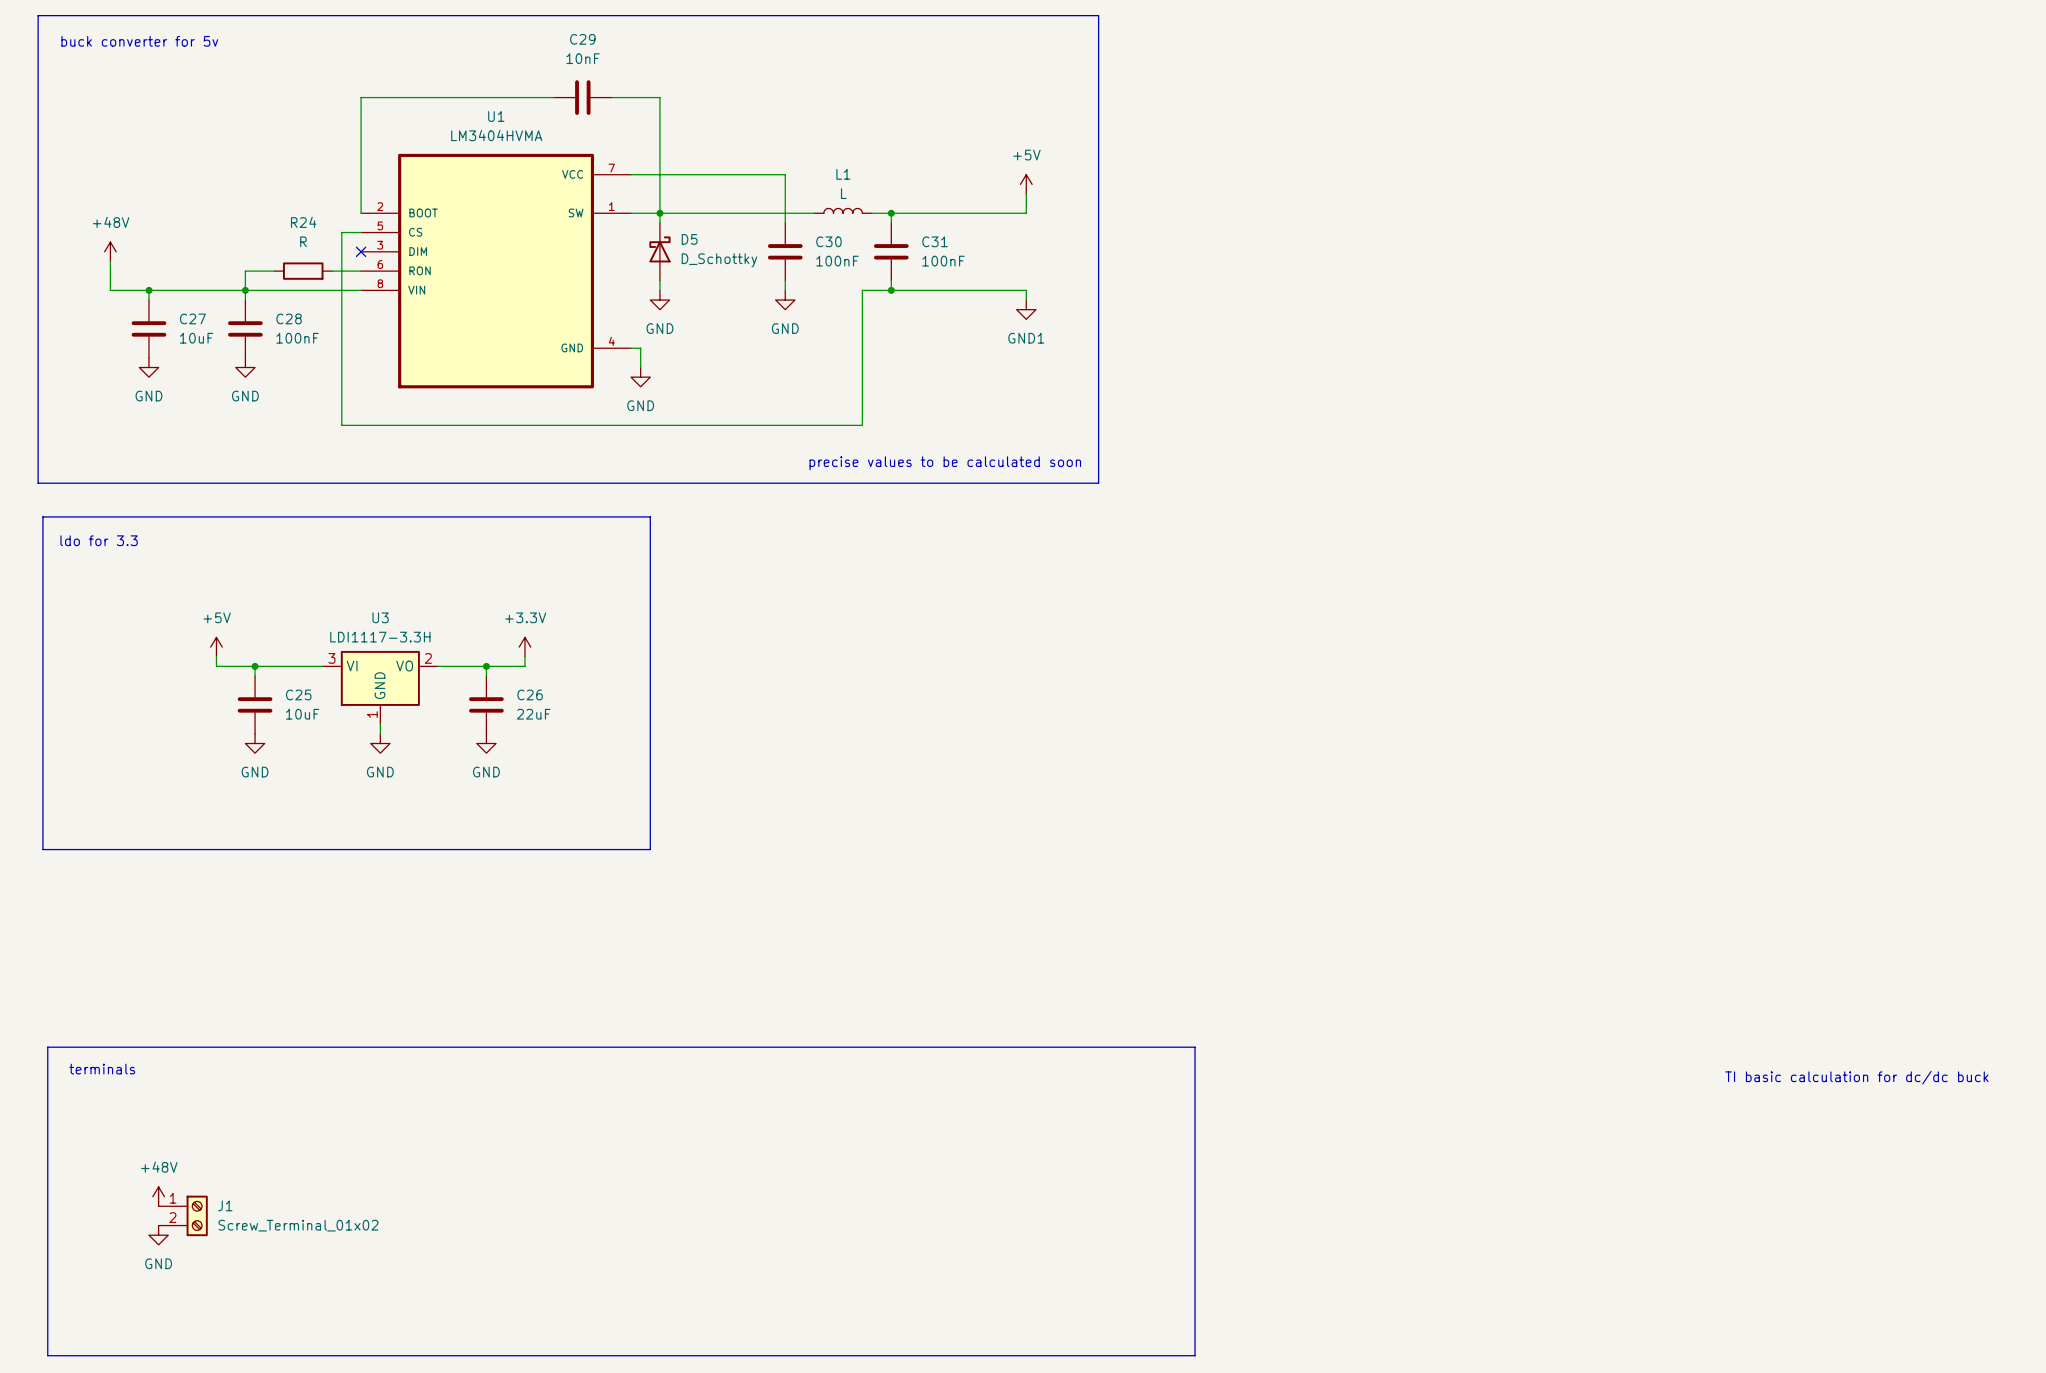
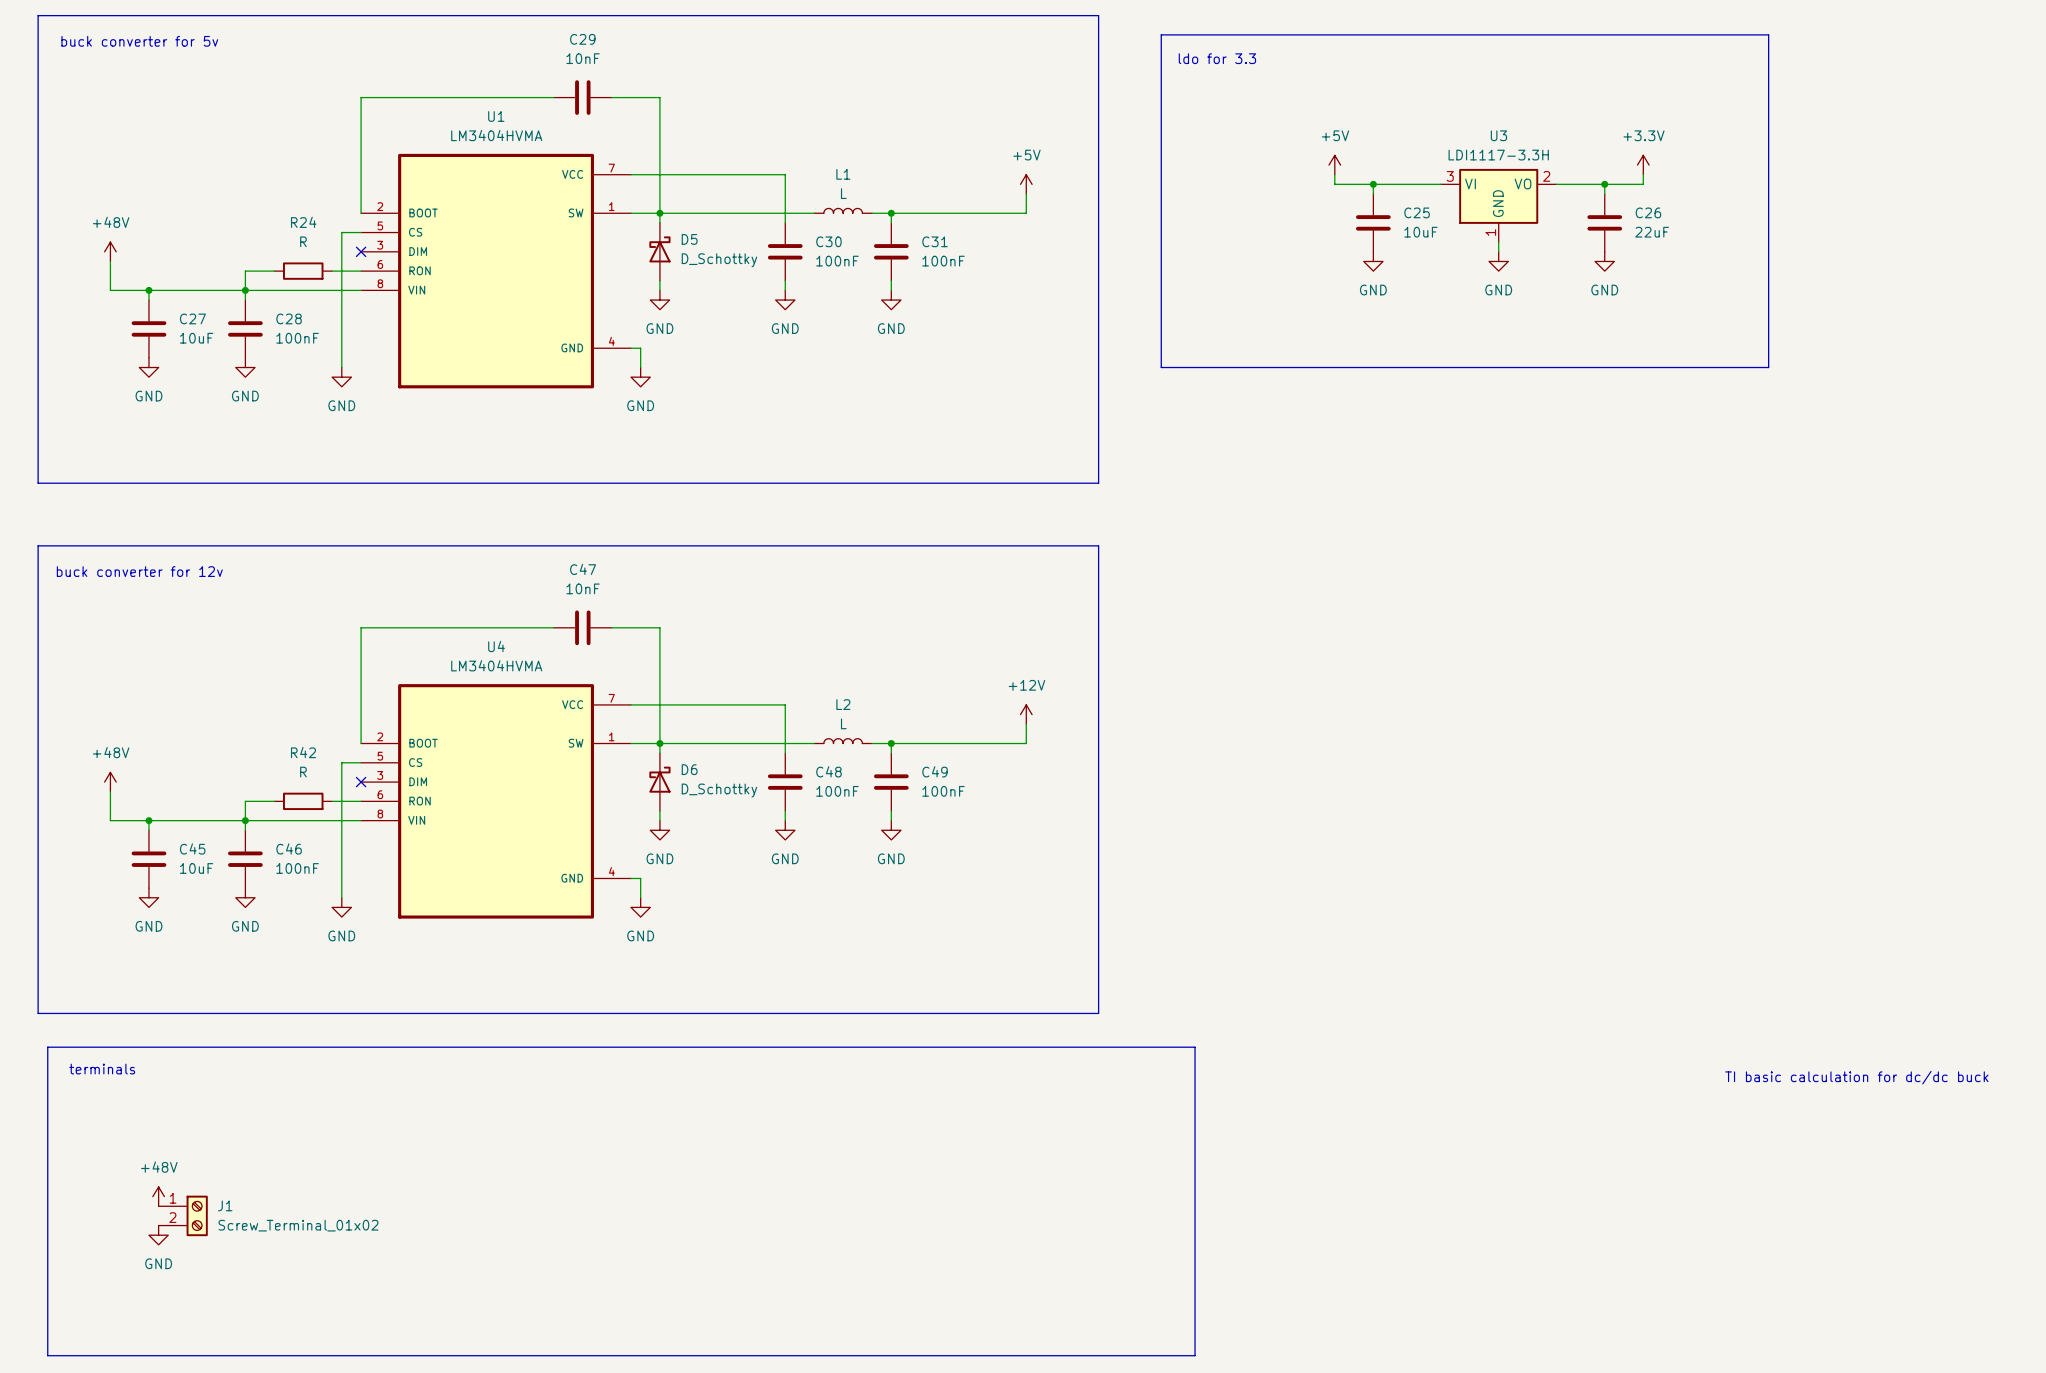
line: none -> (1161, 34) (1768, 34) (1768, 367) (1161, 367) (1161, 34)
text: none -> ldo for 3.3 (1217, 58)
power symbol: none -> +5V (1334, 165)
power symbol: none -> +3.3V (1643, 165)
wire: none -> (1334, 174) (1334, 184) (1440, 184)
wire: none -> (1643, 174) (1643, 184) (1556, 184)
wire: none -> (1373, 184) (1373, 193)
junction: none -> (1373, 184)
wire: none -> (1604, 184) (1604, 193)
junction: none -> (1604, 184)
wire: none -> (1498, 242) (1498, 251)
power symbol: none -> GND (1373, 261)
power symbol: none -> GND (1498, 261)
power symbol: none -> GND (1604, 261)
junction: (891, 290) -> none
power symbol: none -> GND (891, 300)
wire: (1026, 300) (1026, 290) (862, 290) (862, 425) (341, 425) (341, 367) -> none
power symbol: GND1 (1026, 309) -> none
power symbol: none -> GND (341, 377)
text: precise values to be calculated soon (945, 463) -> none
line: (42, 516) (650, 516) (650, 849) (42, 849) (42, 516) -> none
text: ldo for 3.3 (99, 540) -> none
line: none -> (38, 545) (1098, 545) (1098, 1013) (38, 1013) (38, 545)
text: none -> buck converter for 12v (139, 571)
wire: none -> (553, 627) (361, 627) (361, 743)
C47: none -> 10nF (582, 627)
wire: none -> (611, 627) (659, 627) (659, 753)
power symbol: +5V (216, 647) -> none
power symbol: +3.3V (524, 647) -> none
wire: (216, 656) (216, 666) (322, 666) -> none
wire: (524, 656) (524, 666) (438, 666) -> none
wire: (255, 666) (255, 676) -> (148, 820) (148, 830)
junction: (255, 666) -> none
wire: (486, 666) (486, 676) -> none
junction: (486, 666) -> none
U3 position: (380, 687) -> (1498, 205)
C25 position: (255, 704) -> (1373, 222)
C26 position: (486, 704) -> (1604, 222)
wire: none -> (631, 704) (785, 704) (785, 753)
power symbol: none -> +12V (1026, 714)
wire: (380, 724) (380, 733) -> none
wire: none -> (1026, 724) (1026, 743) (872, 743)
L2: none -> L (843, 741)
power symbol: GND (255, 743) -> none
power symbol: GND (380, 743) -> none
power symbol: GND (486, 743) -> none
wire: none -> (631, 743) (814, 743)
junction: none -> (659, 743)
wire: none -> (891, 743) (891, 753)
junction: none -> (891, 743)
wire: none -> (361, 762) (341, 762) (341, 897)
power symbol: none -> +48V (110, 782)
no-connect mark: none -> (361, 782)
D6: none -> D_Schottky (659, 782)
C48: none -> 100nF (785, 782)
C49: none -> 100nF (891, 782)
wire: none -> (110, 791) (110, 820) (361, 820)
wire: none -> (274, 801) (245, 801) (245, 830)
R42: none -> R (303, 801)
wire: none -> (332, 801) (361, 801)
U4: none -> LM3404HVMA (496, 801)
wire: none -> (659, 811) (659, 820)
wire: none -> (785, 811) (785, 820)
wire: none -> (891, 811) (891, 820)
junction: none -> (148, 820)
junction: none -> (245, 820)
power symbol: none -> GND (659, 830)
power symbol: none -> GND (785, 830)
power symbol: none -> GND (891, 830)
C45: none -> 10uF (148, 859)
C46: none -> 100nF (245, 859)
wire: none -> (631, 878) (640, 878) (640, 897)
power symbol: none -> GND (148, 897)
power symbol: none -> GND (245, 897)
power symbol: none -> GND (341, 907)
power symbol: none -> GND (640, 907)

